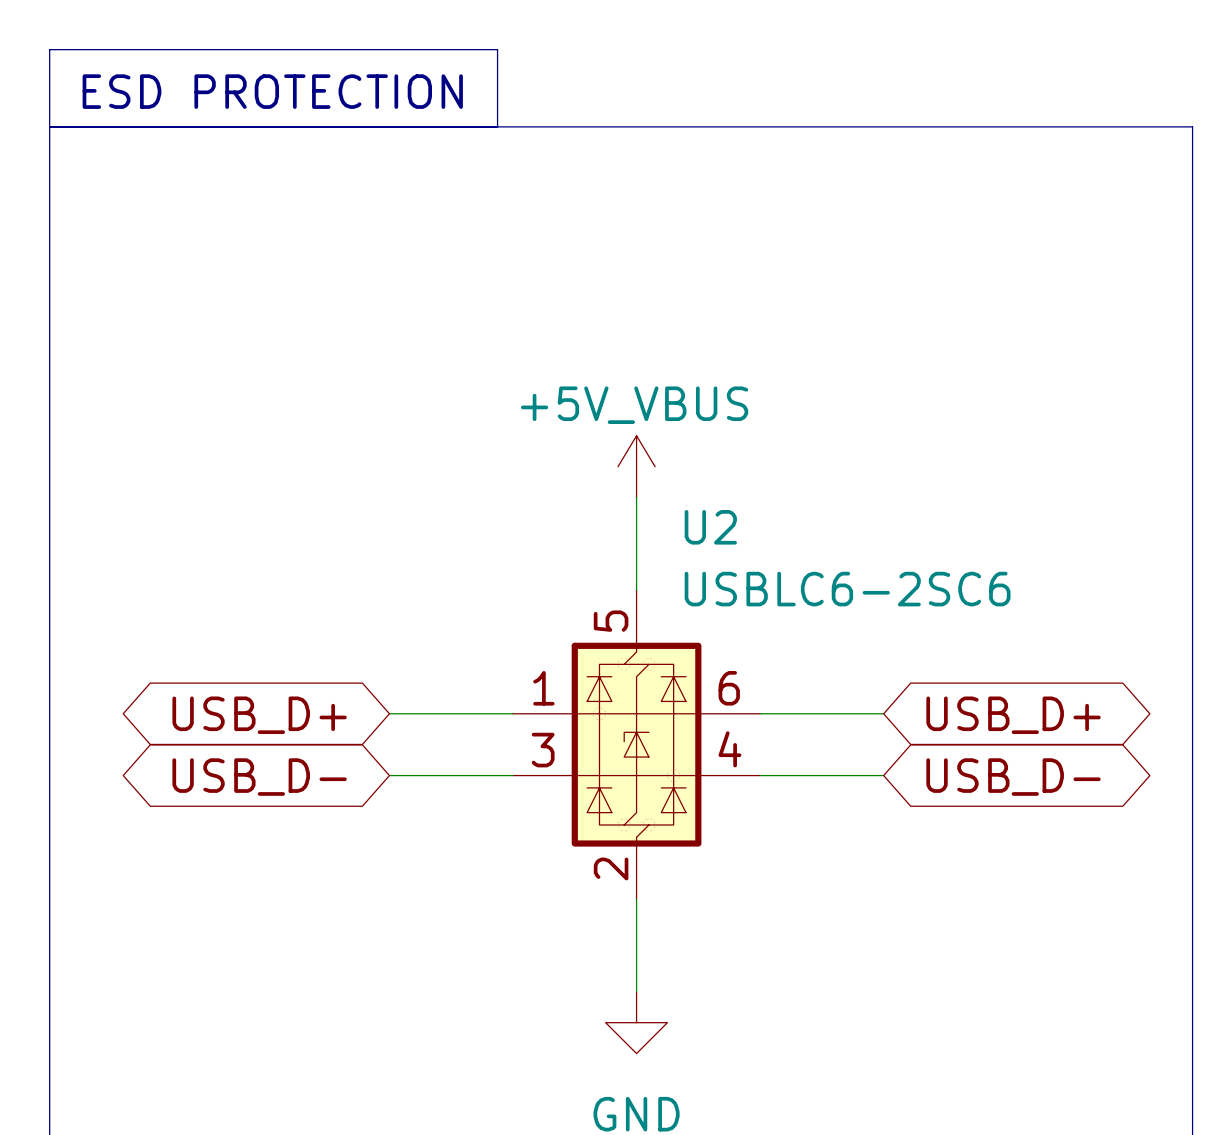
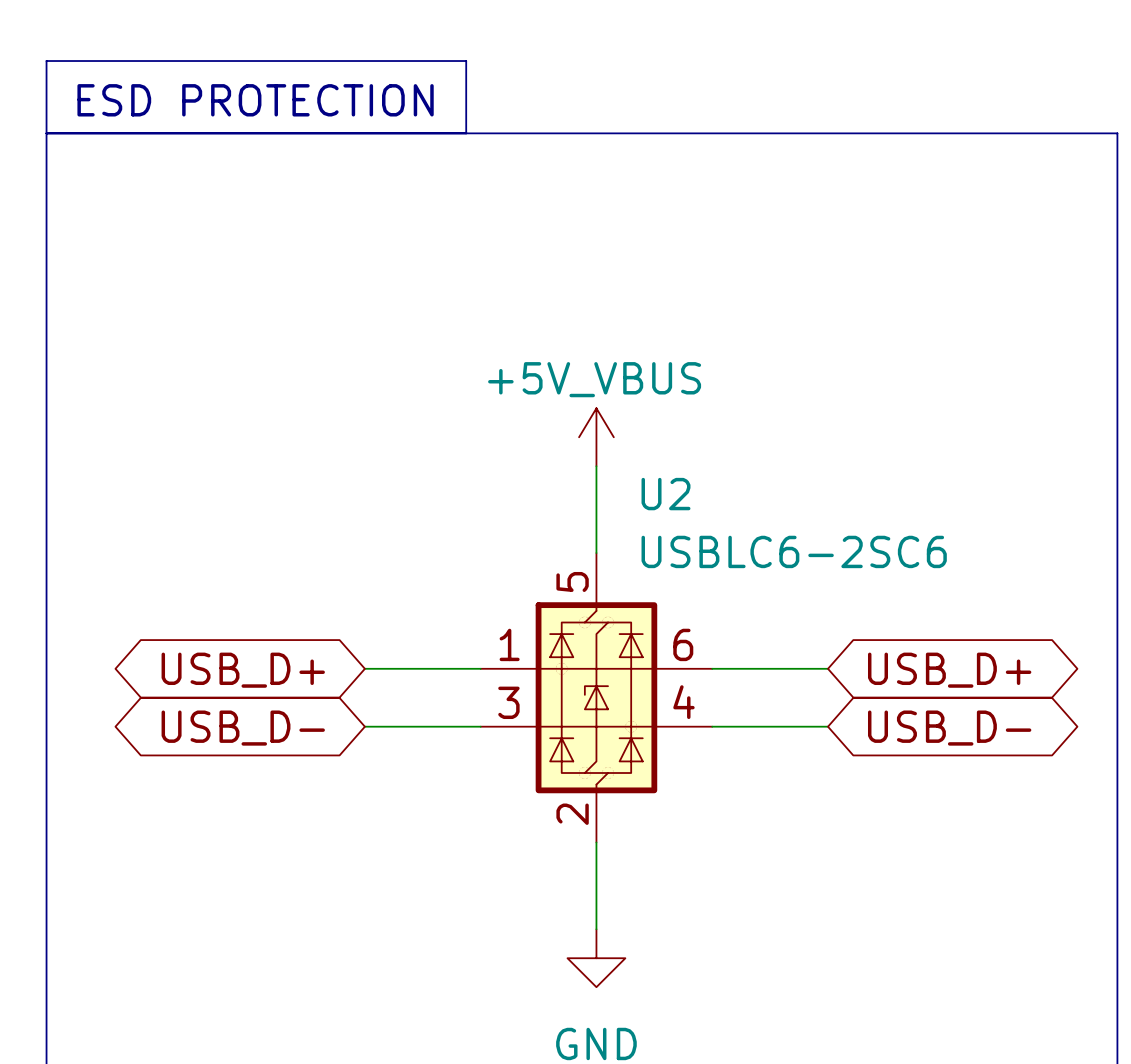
line: (49, 65) (49, 49) (497, 49) (497, 126) -> (46, 61) (466, 61) (466, 133)
text position: ESD PROTECTION (272, 91) -> ESD PROTECTION (255, 100)
line: (49, 126) (1192, 126) (1192, 142) -> (46, 133) (1117, 133)

